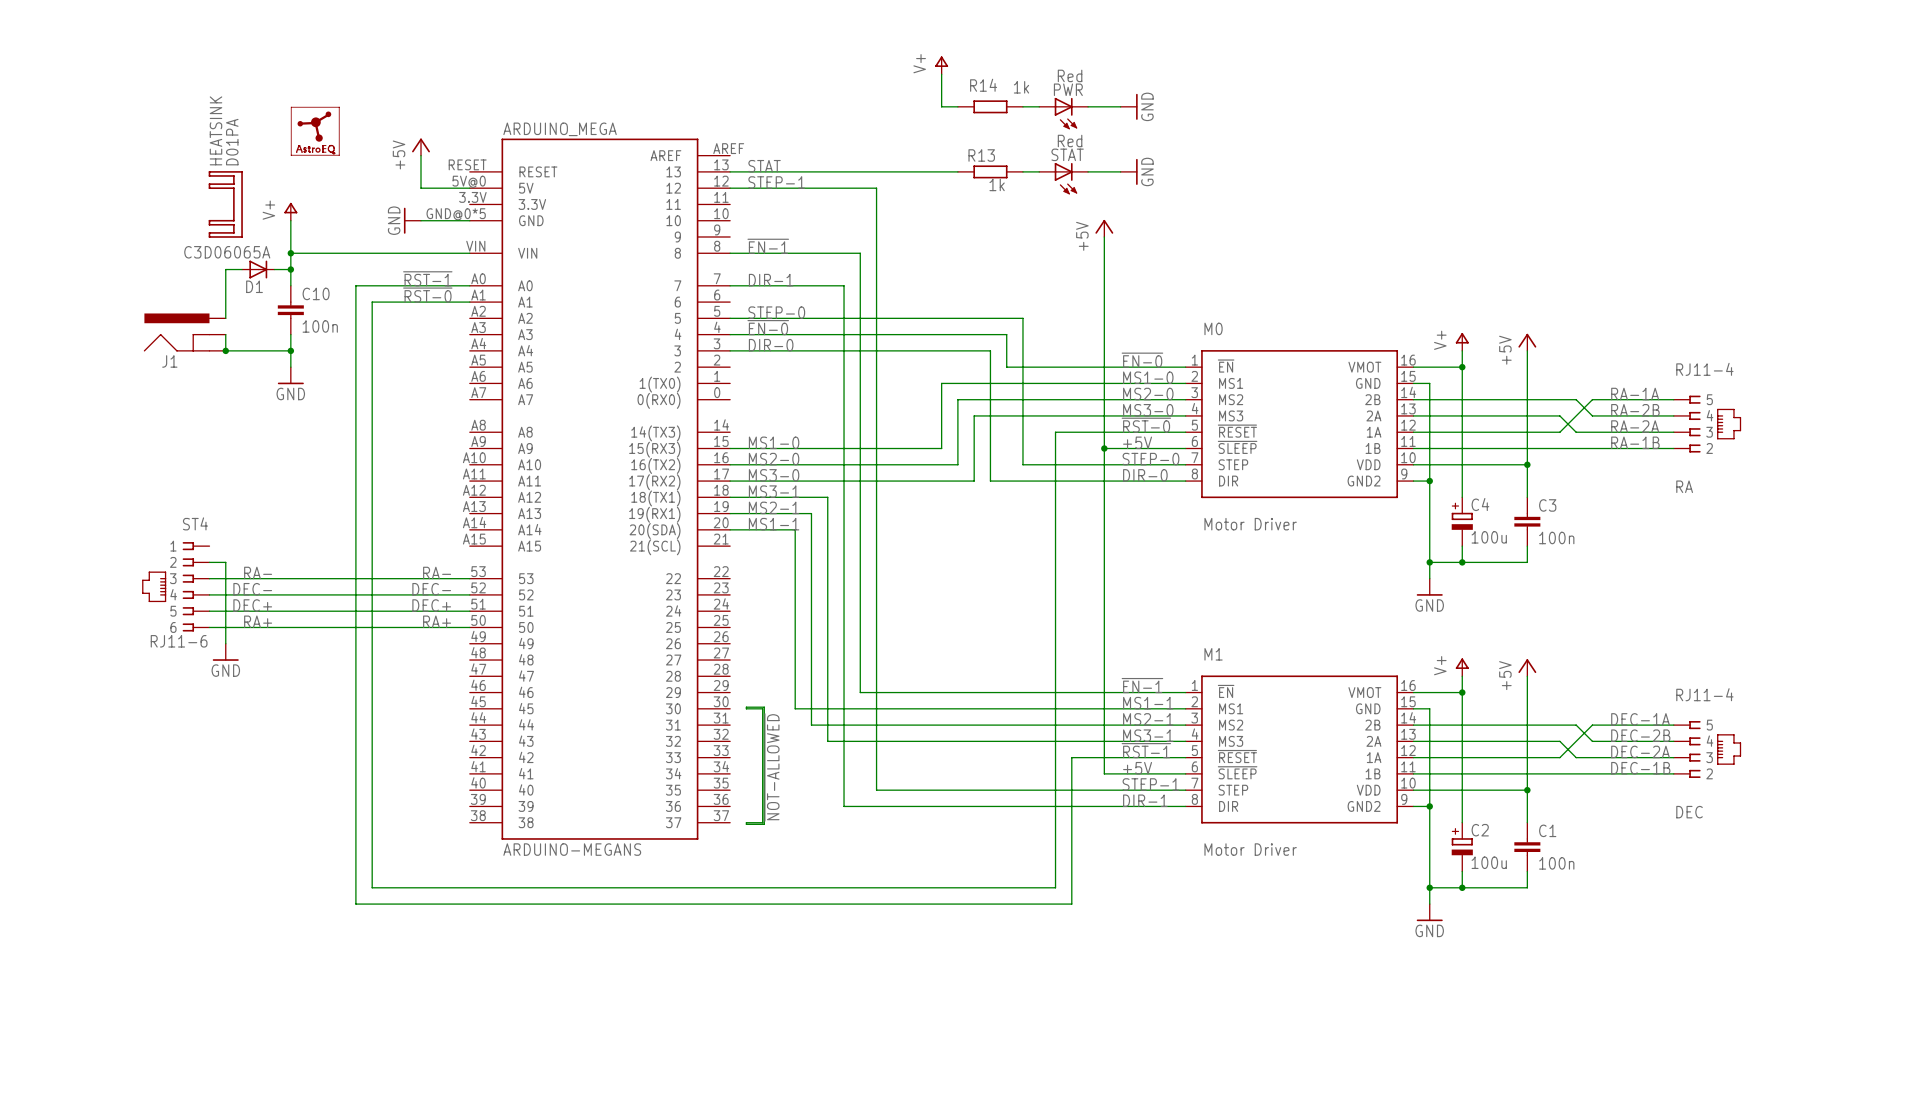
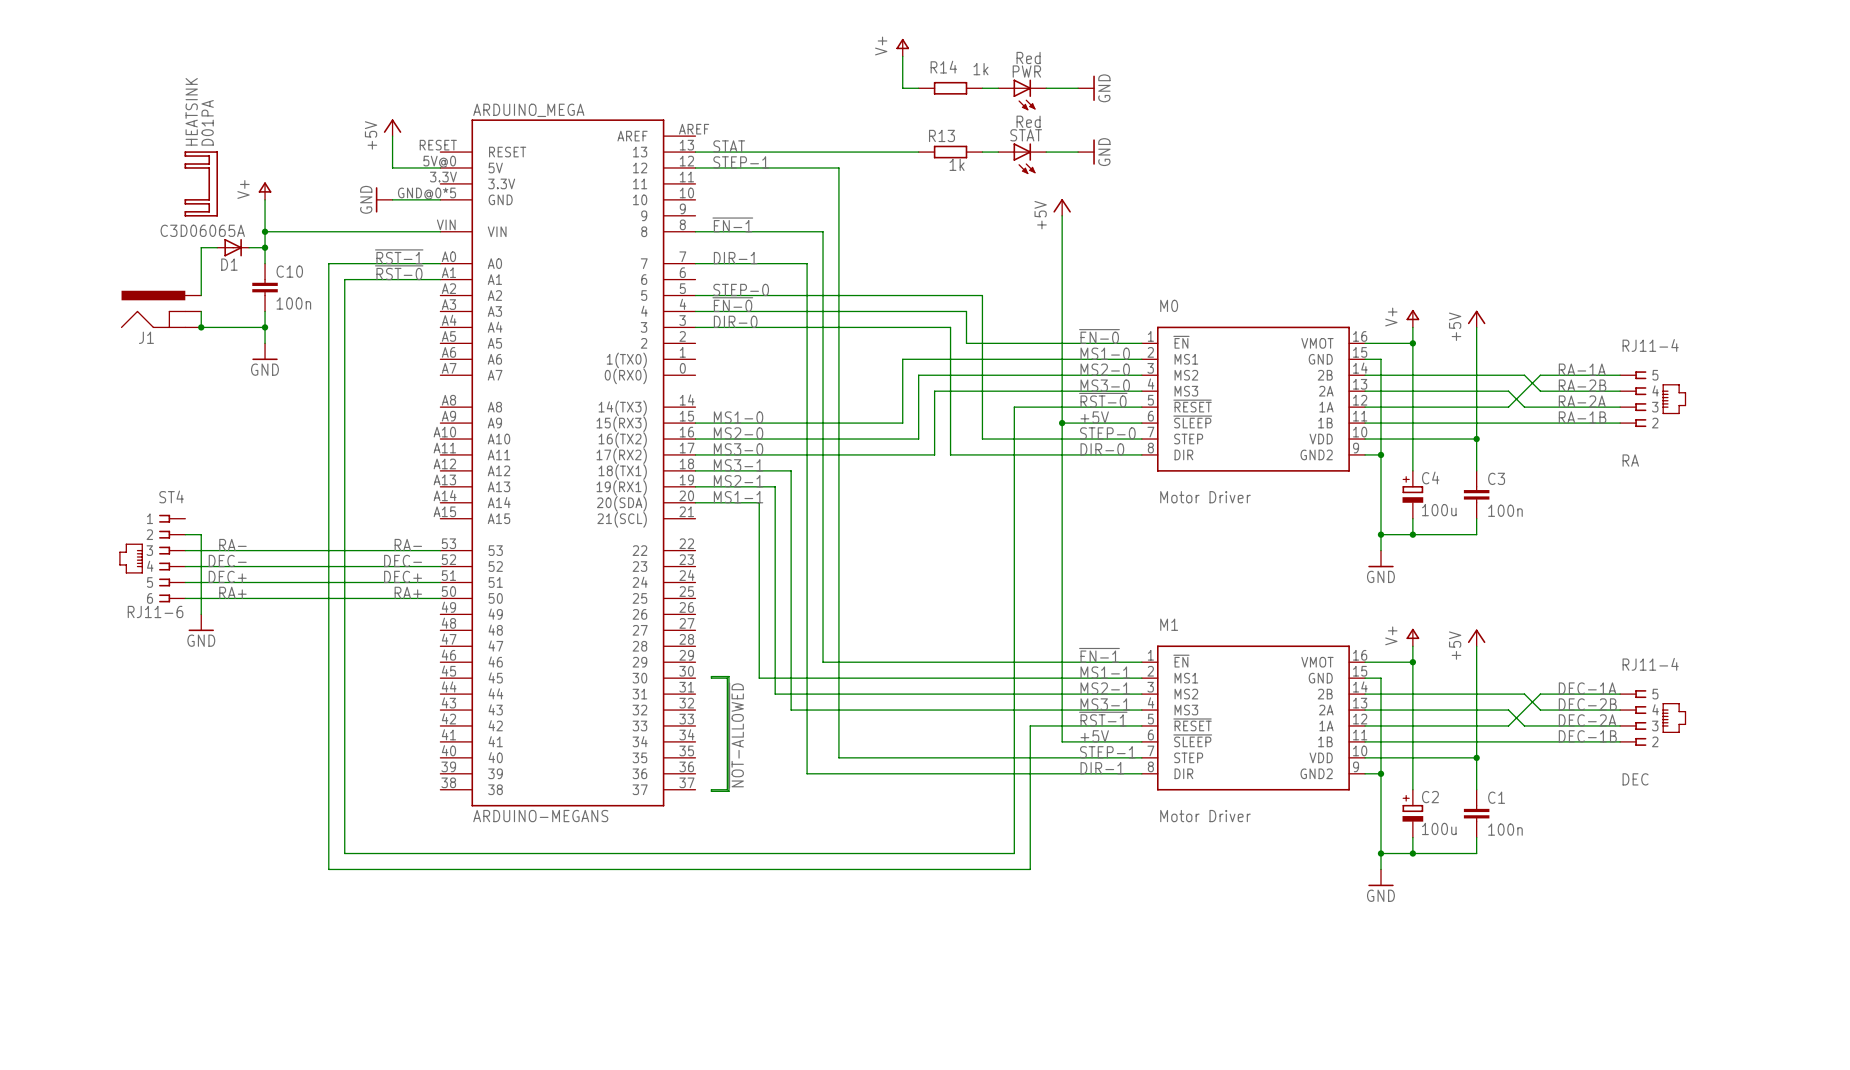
part: (315, 131) -> none

